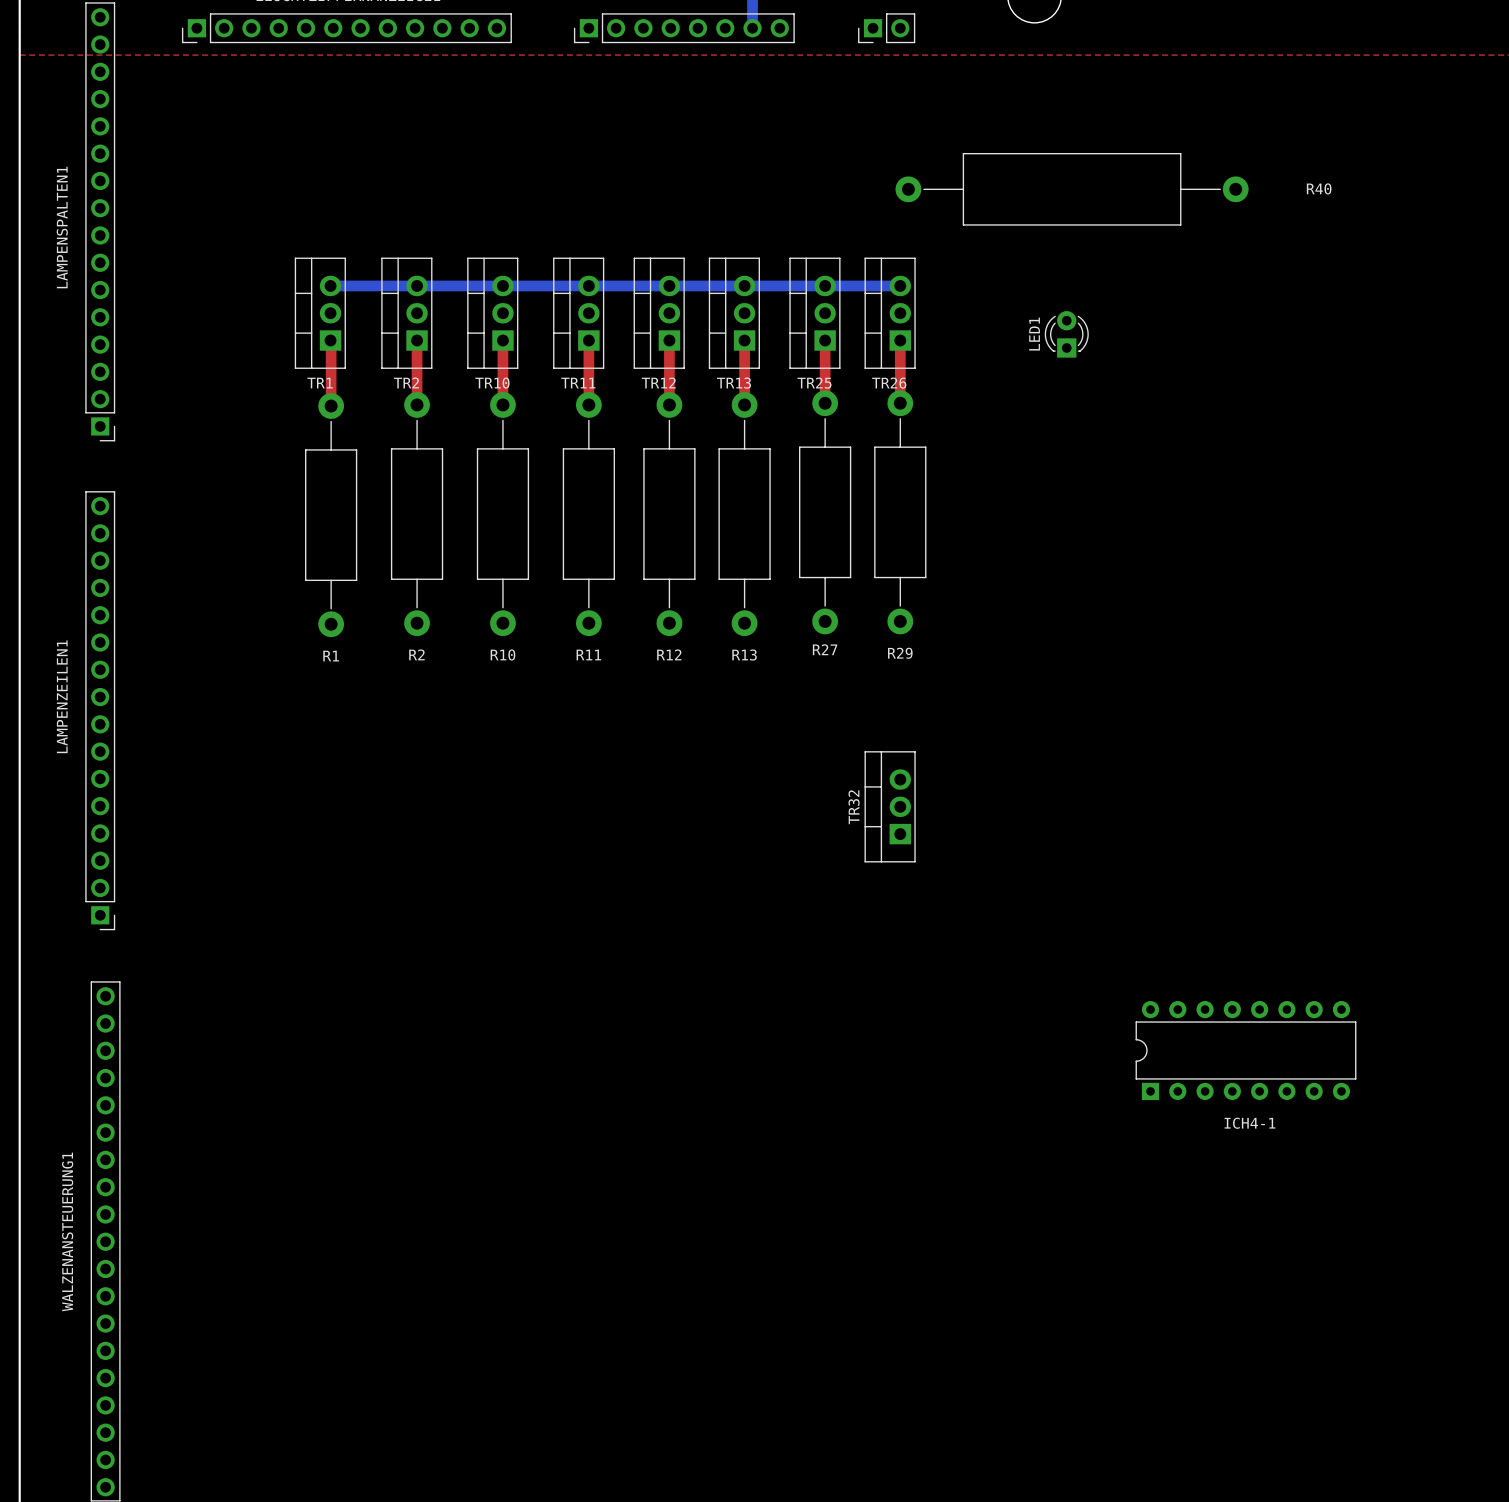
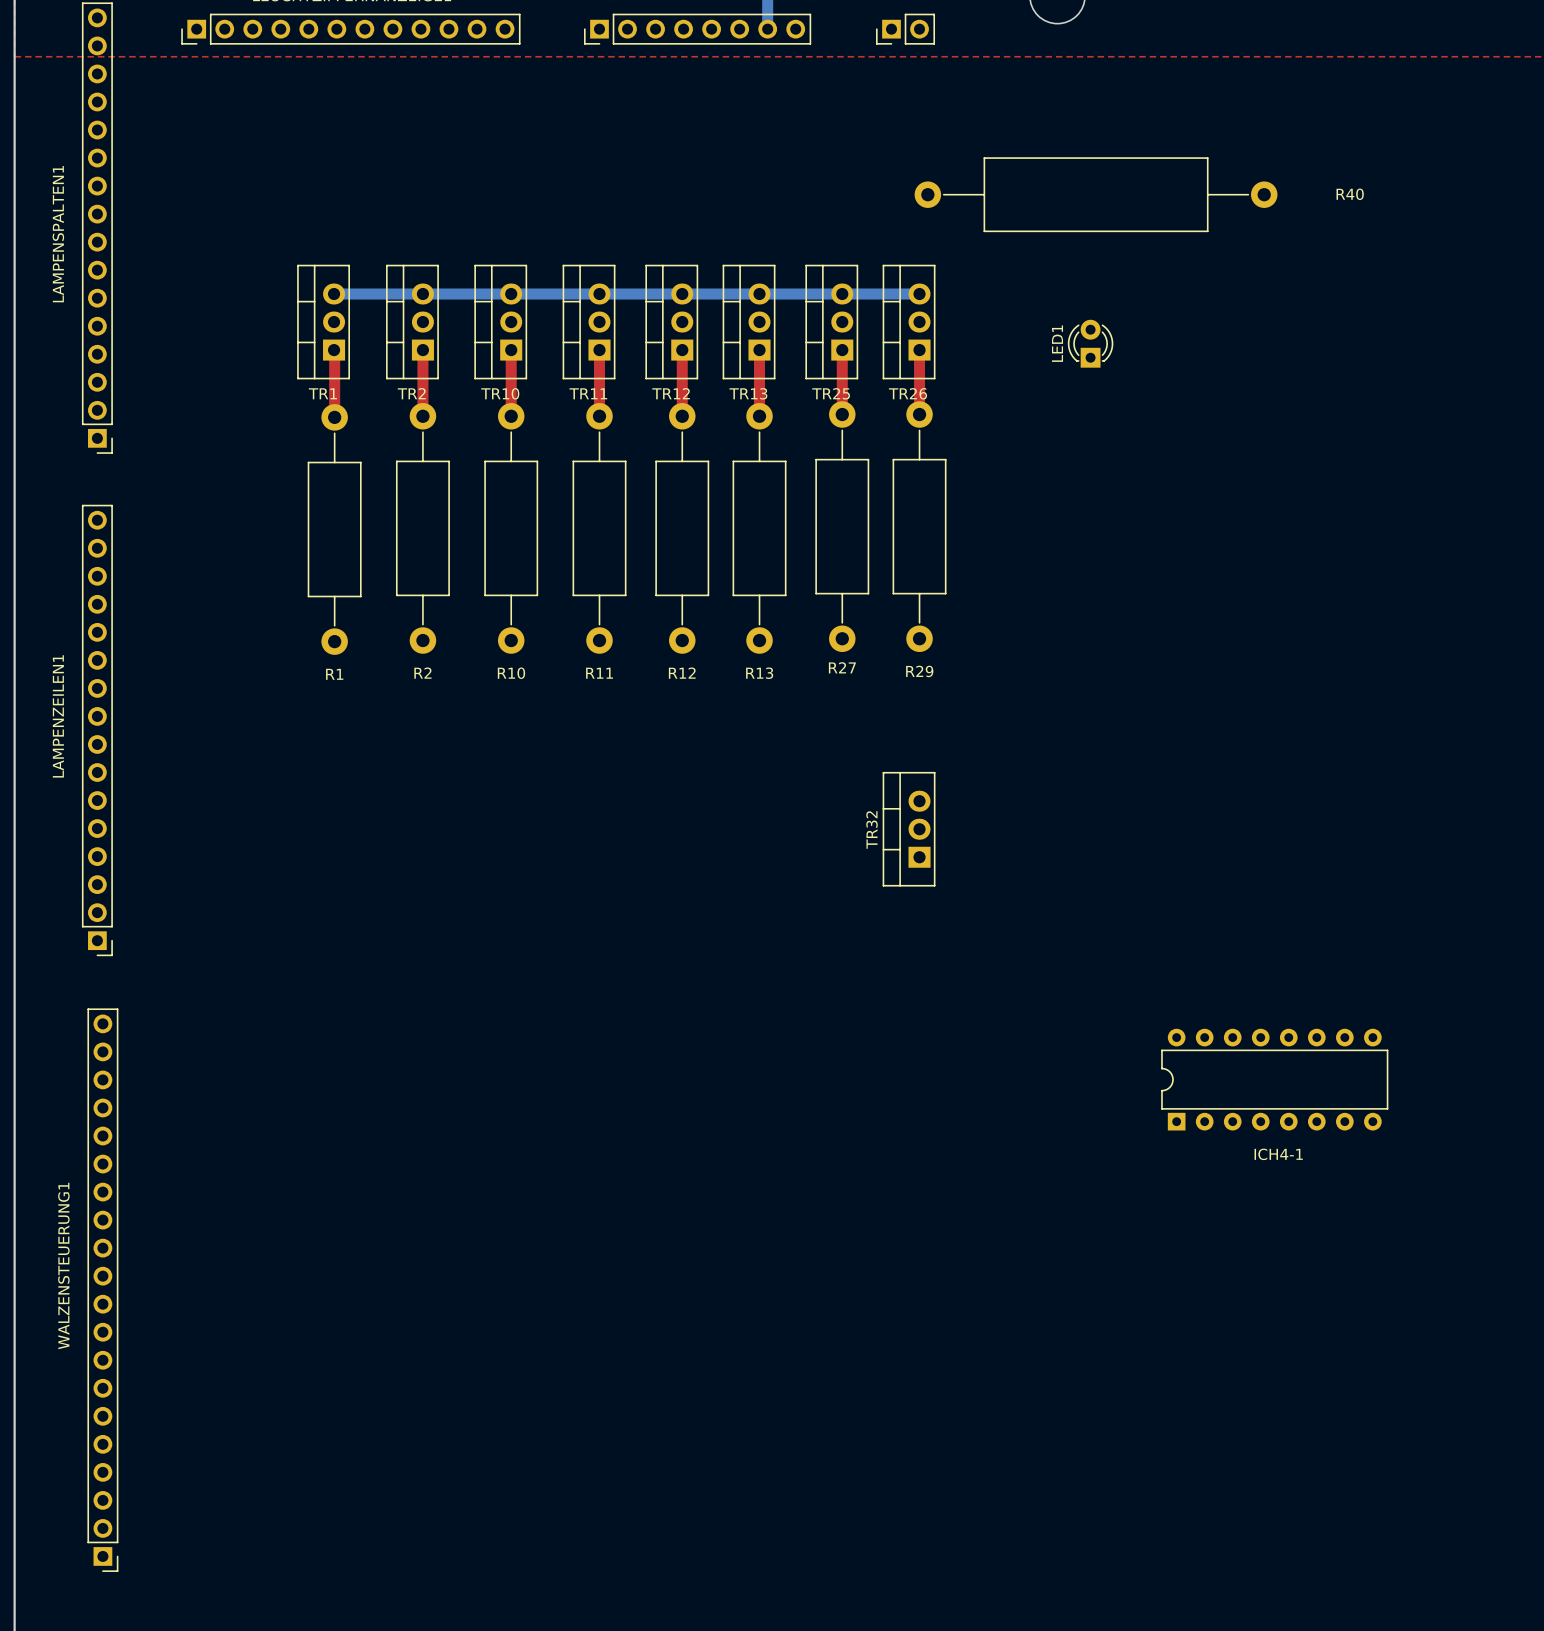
WALZENANSTEUERUNG1 name: WALZENANSTEUERUNG1 (67, 1231) -> WALZENSTEUERUNG1 (63, 1266)

